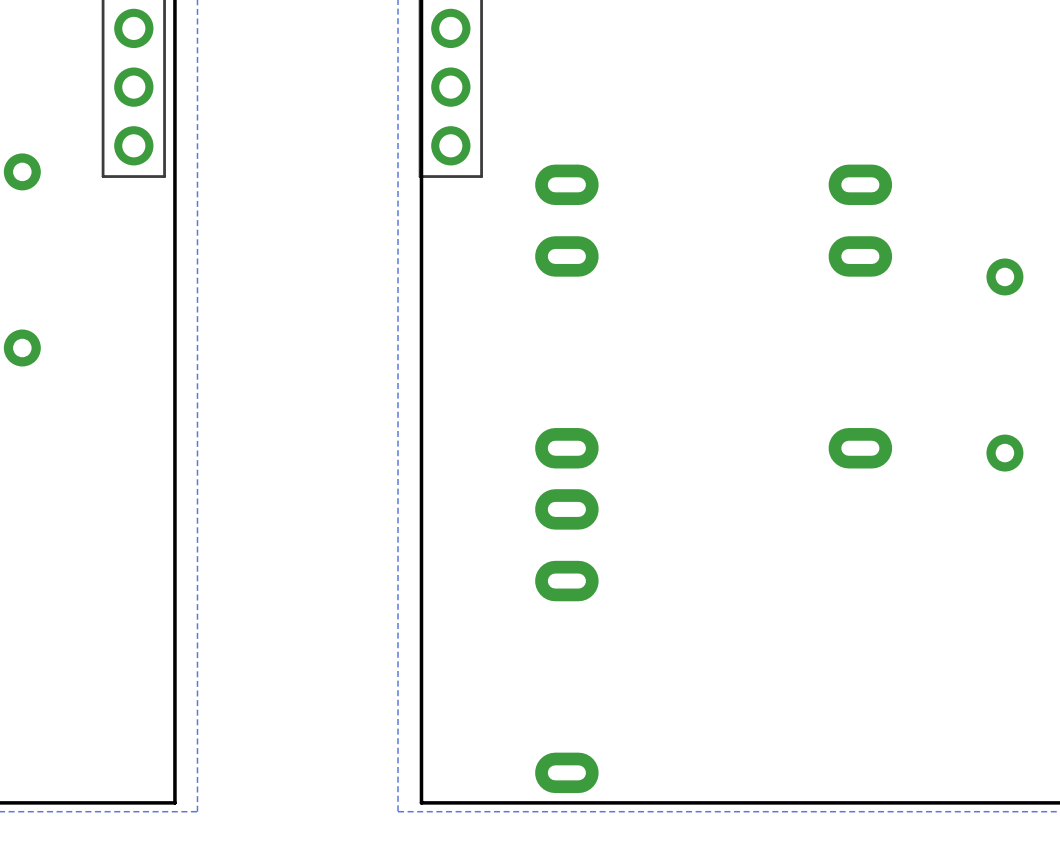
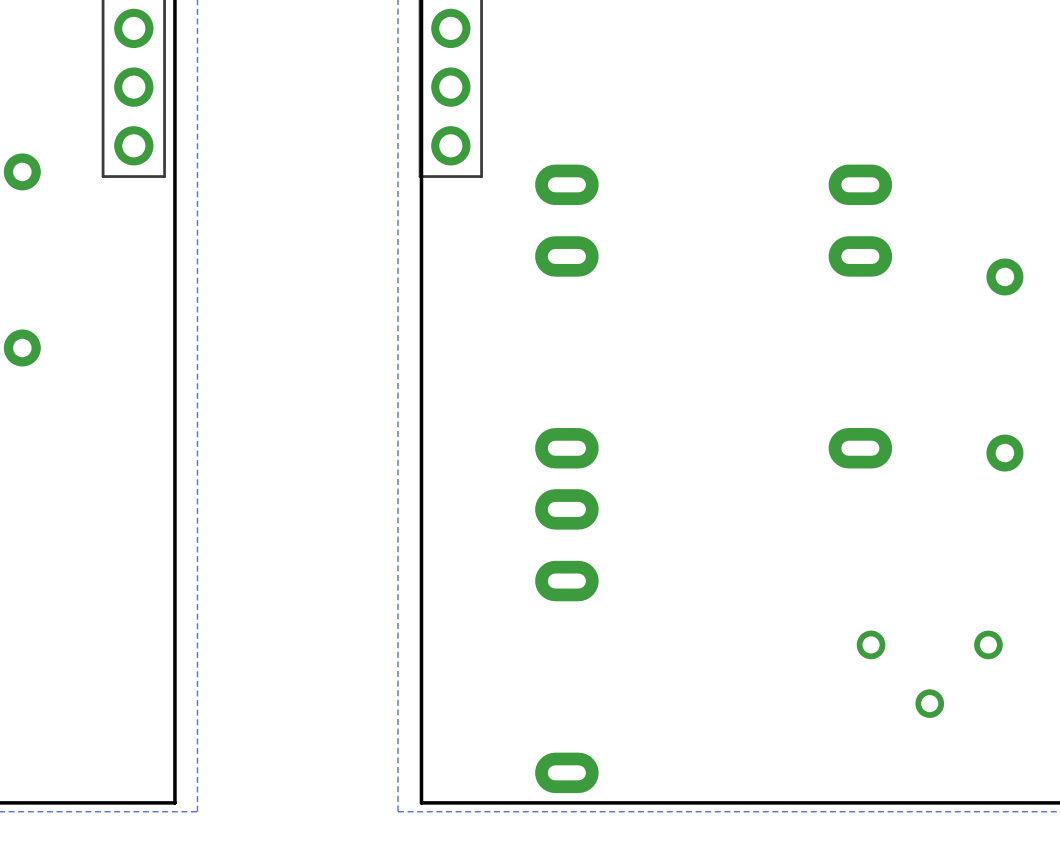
part: none -> (929, 674)

